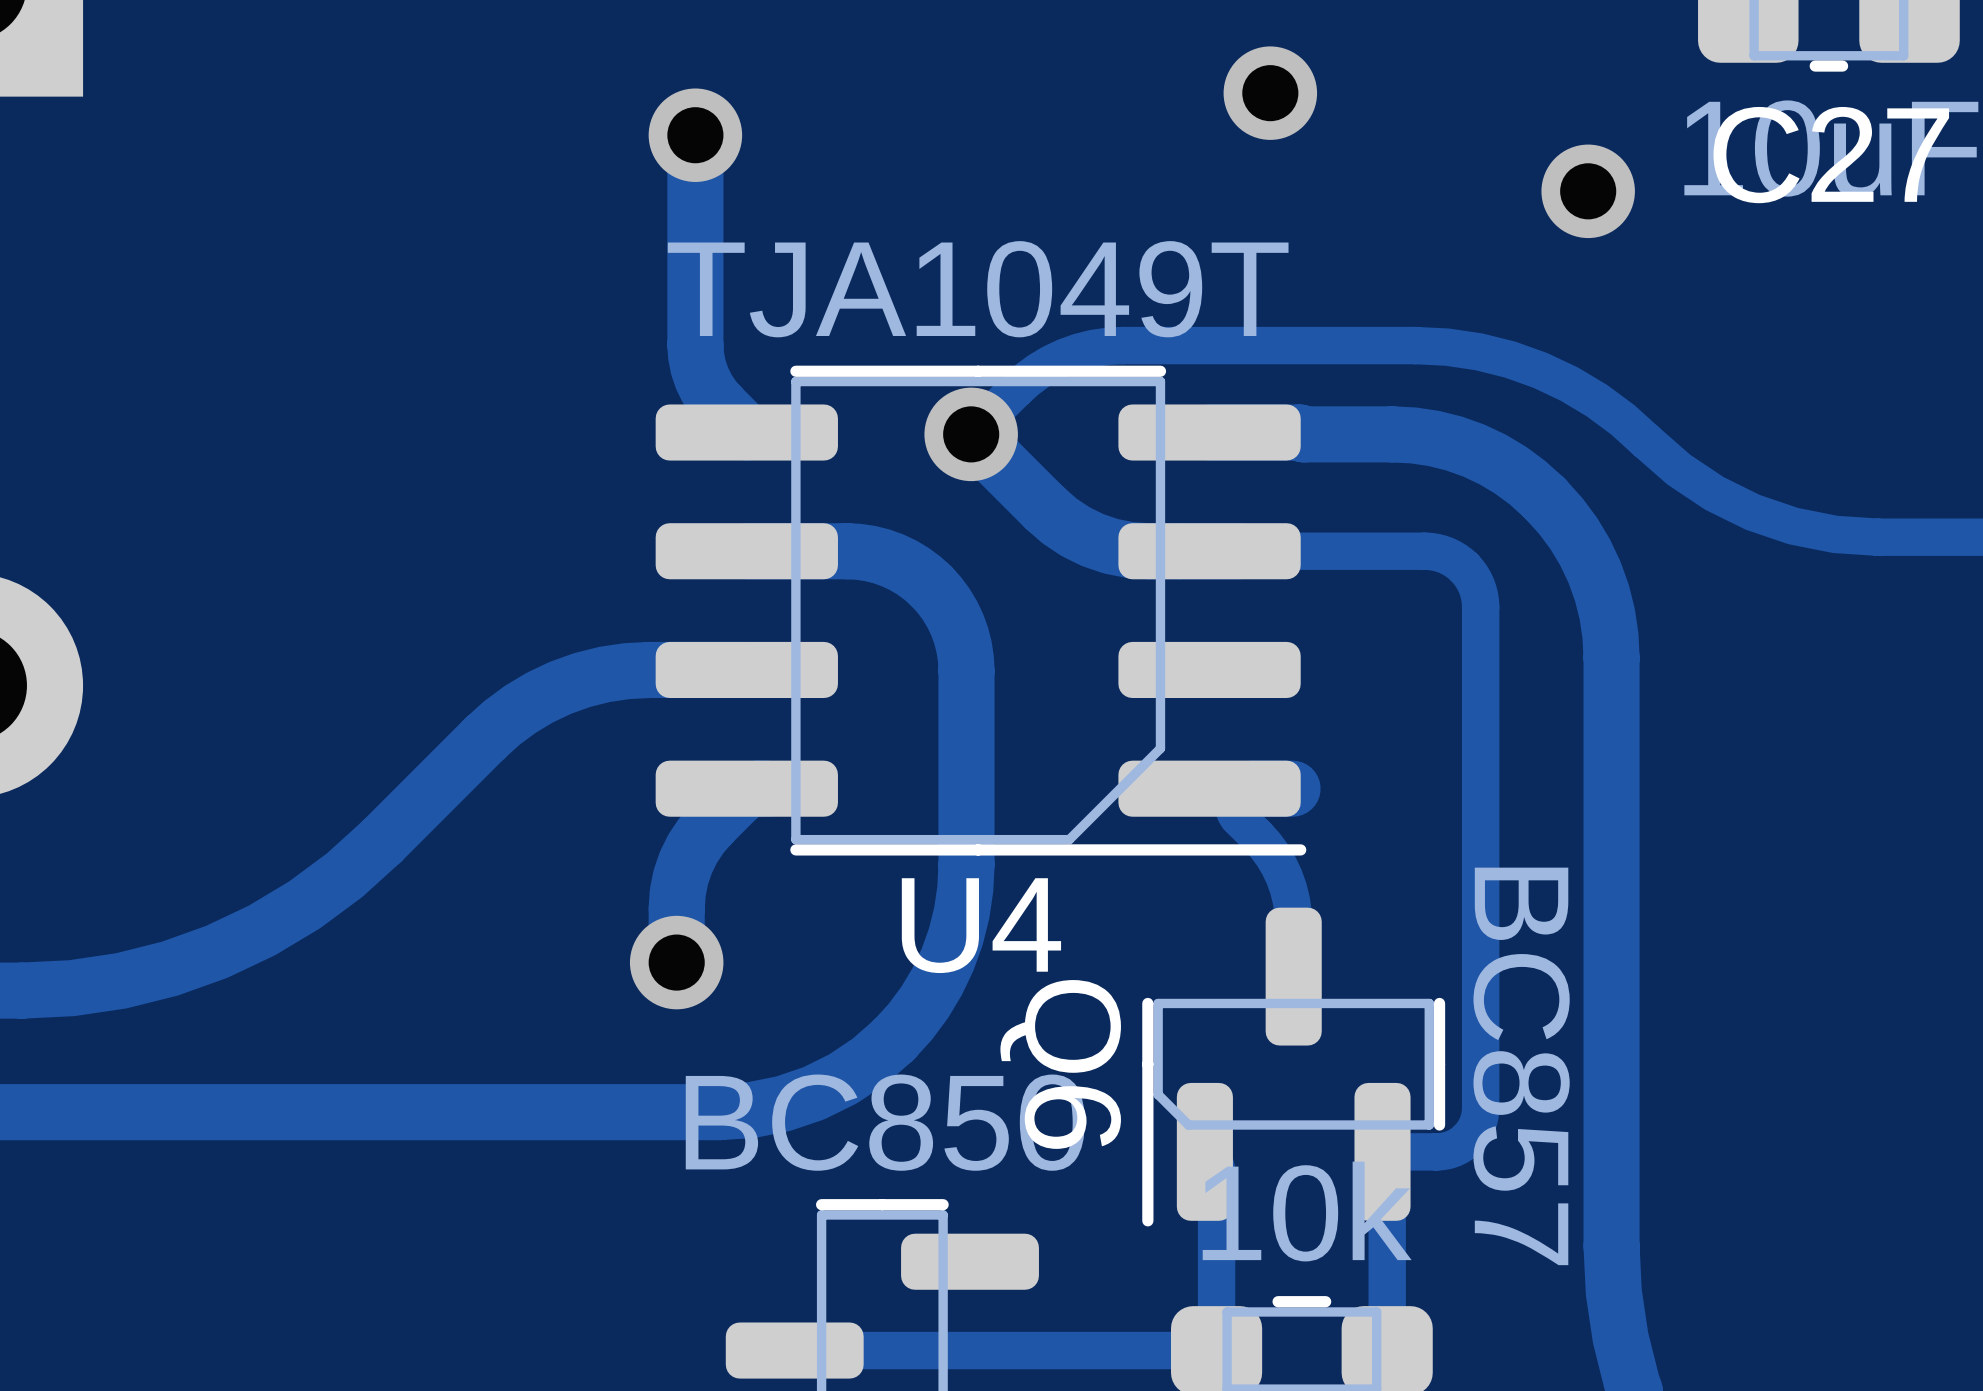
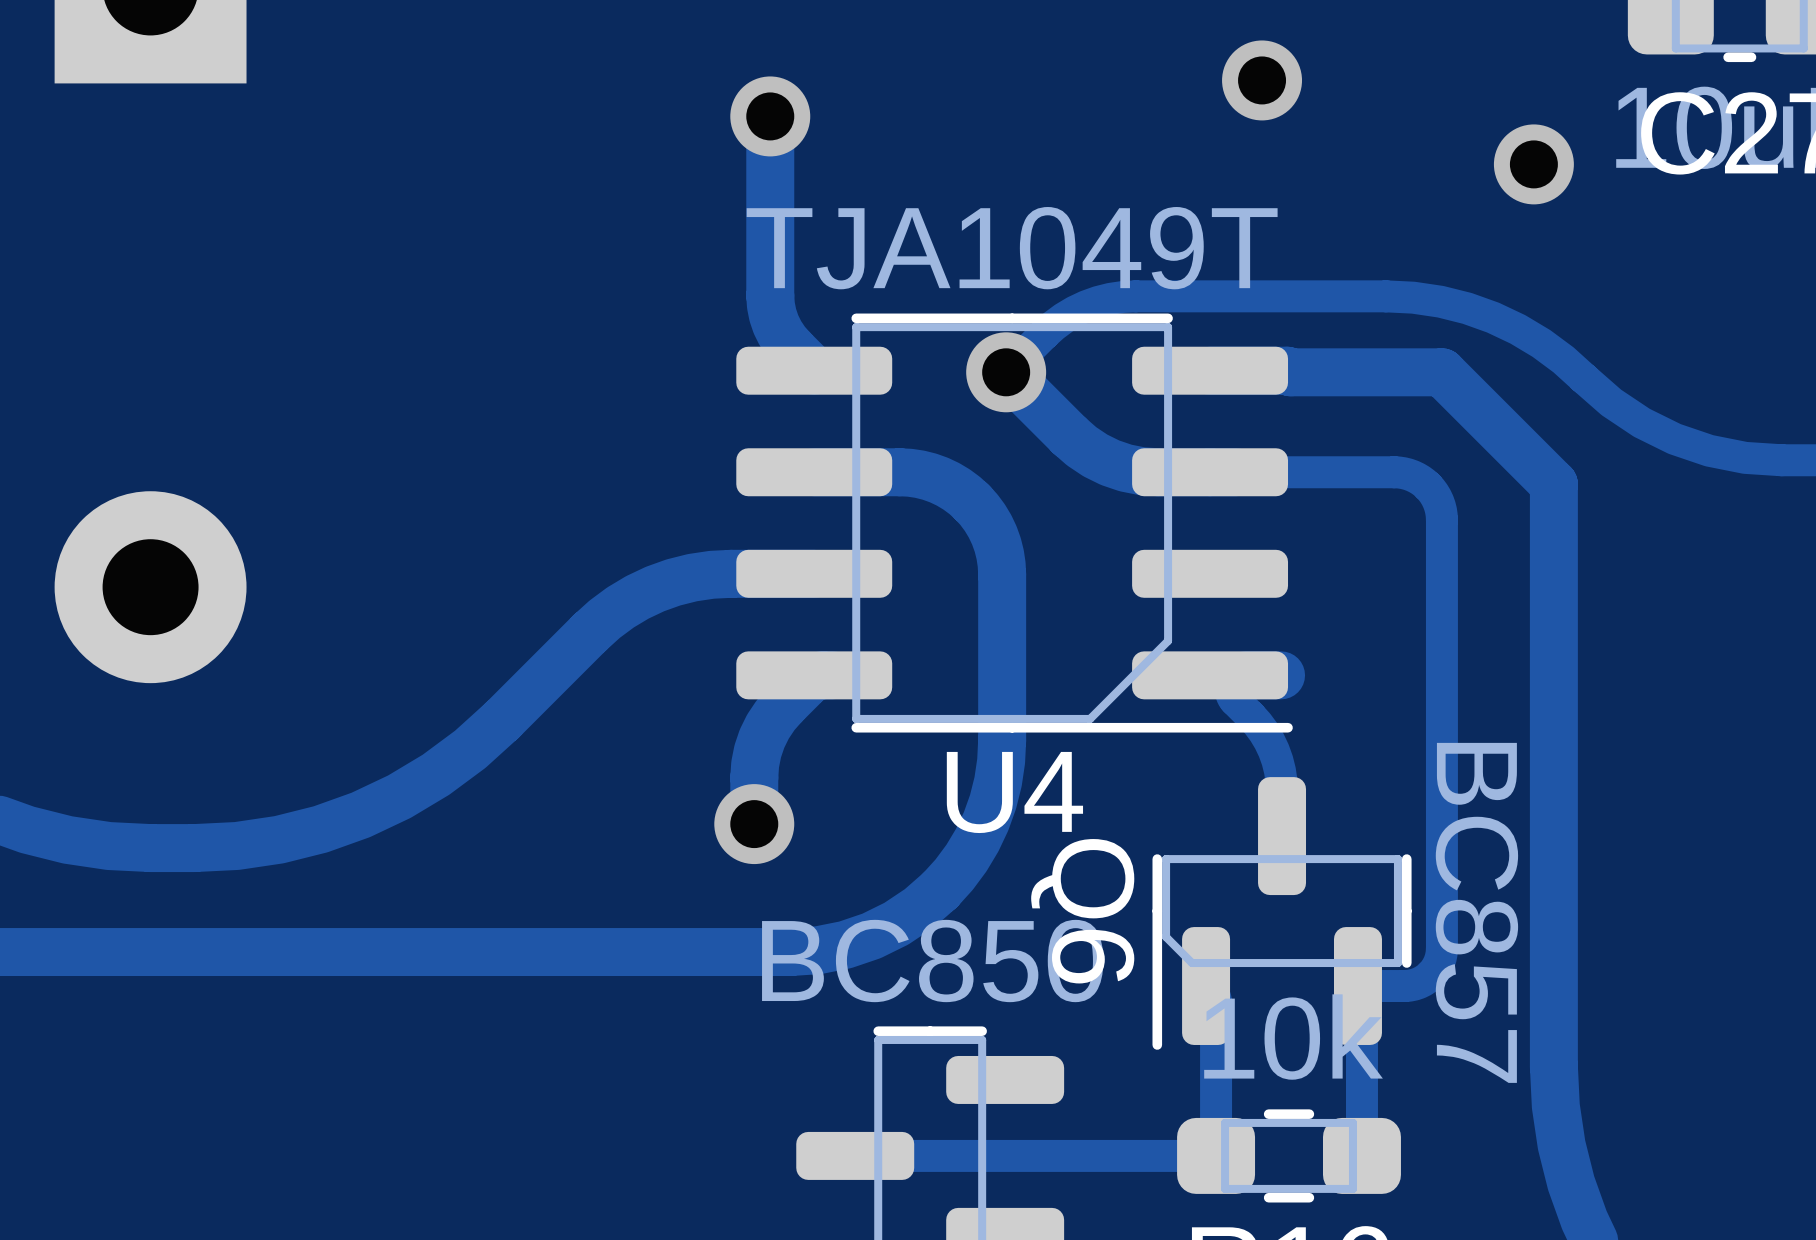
track: (1392, 434) (1433, 438) (1473, 450) (1510, 470) (1543, 496) -> (1366, 372) (1441, 372) (1495, 425)
track: (1546, 499) (1573, 533) (1594, 572) (1607, 614) (1611, 657) -> (1497, 428) (1553, 484) (1553, 563)

